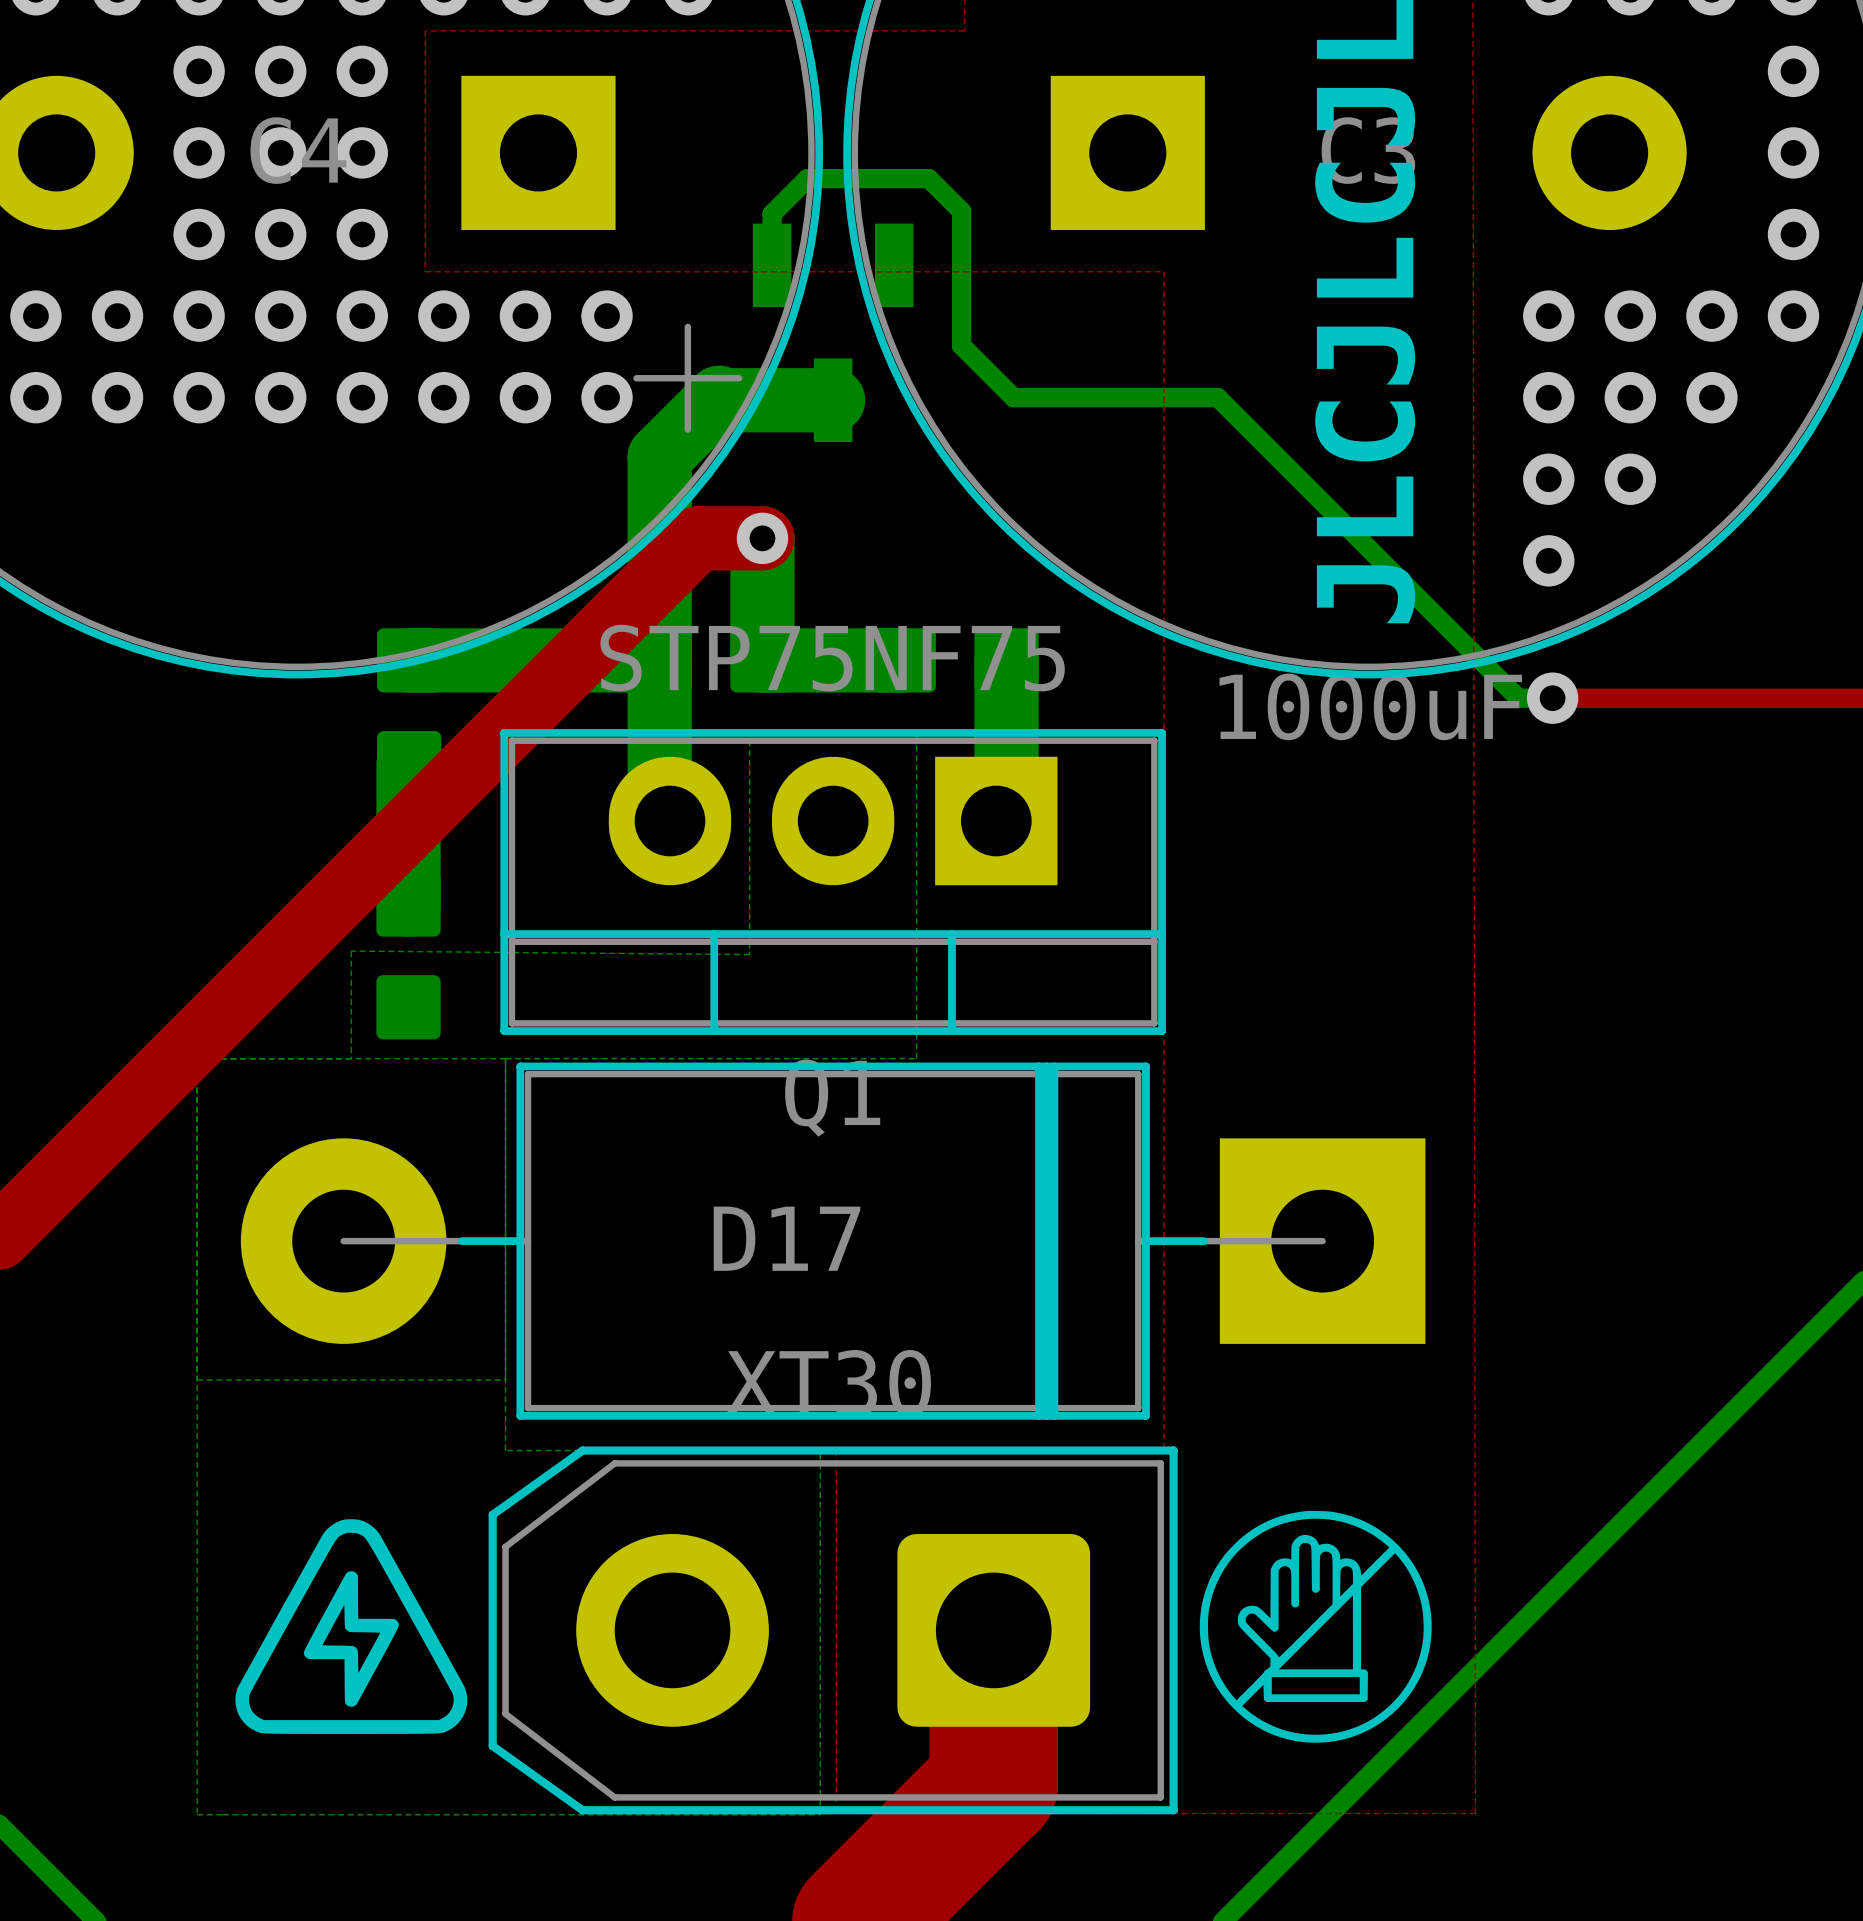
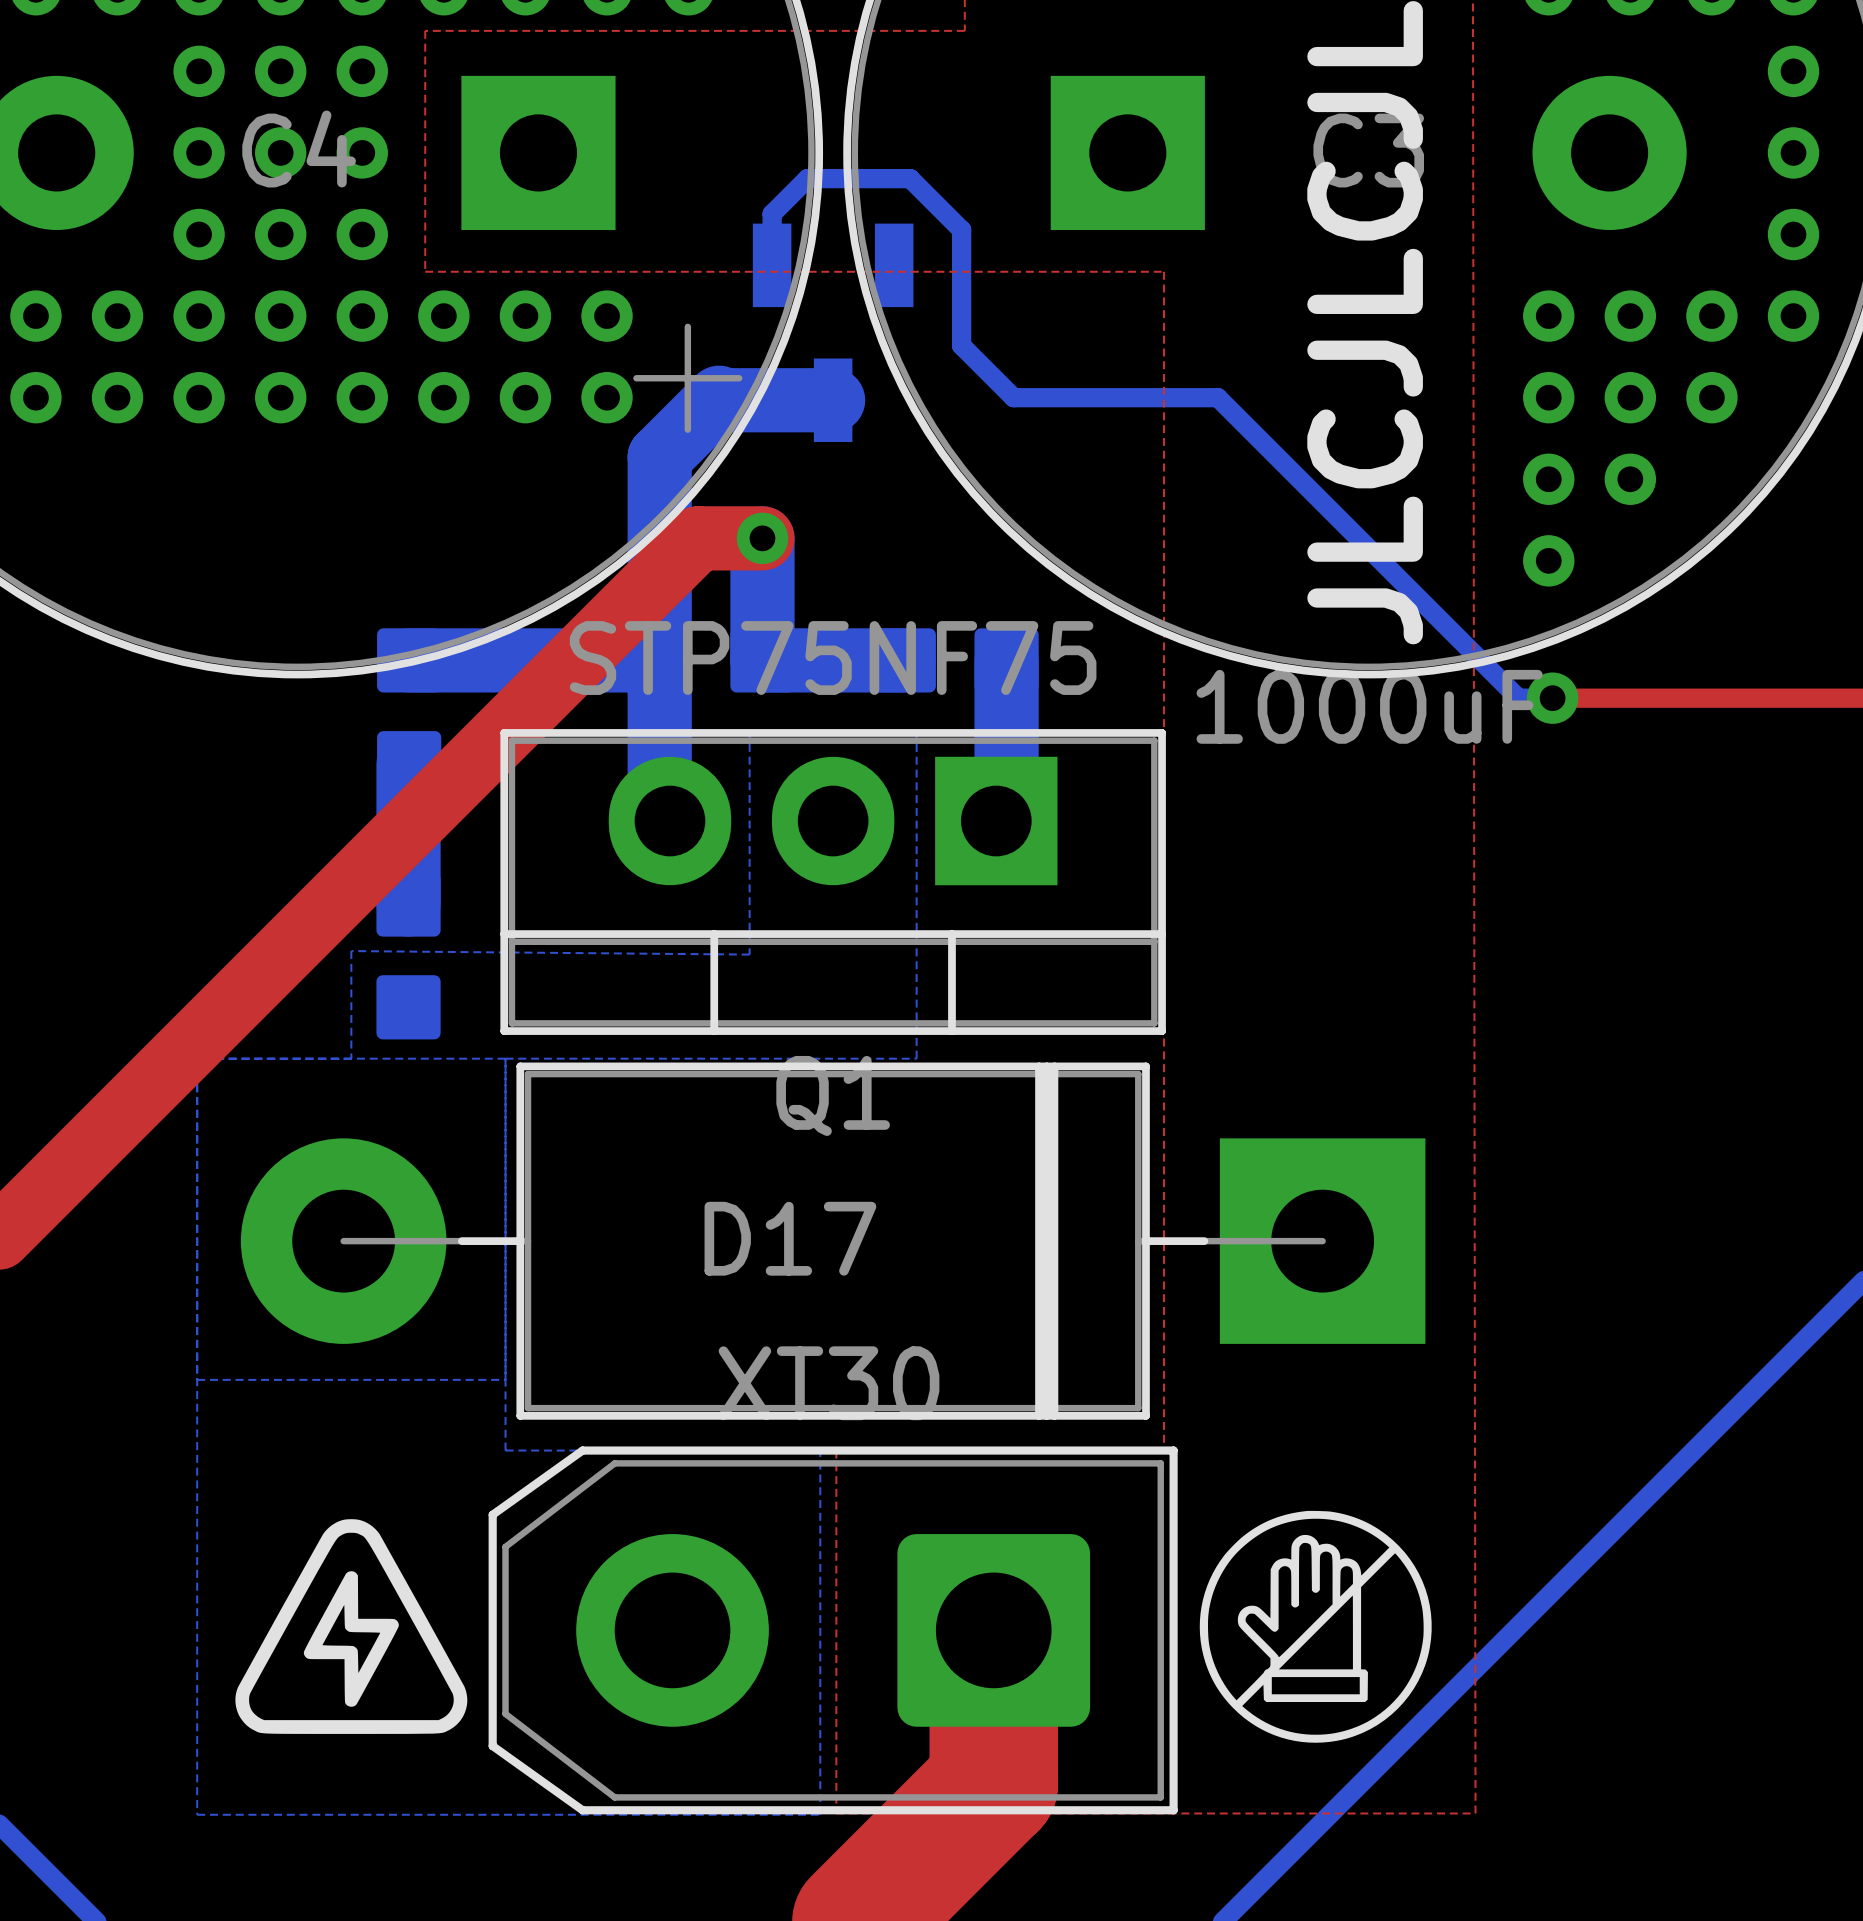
bottom track: (910, 178) (928, 178) (961, 211) (961, 230) -> (910, 178) (961, 230)

